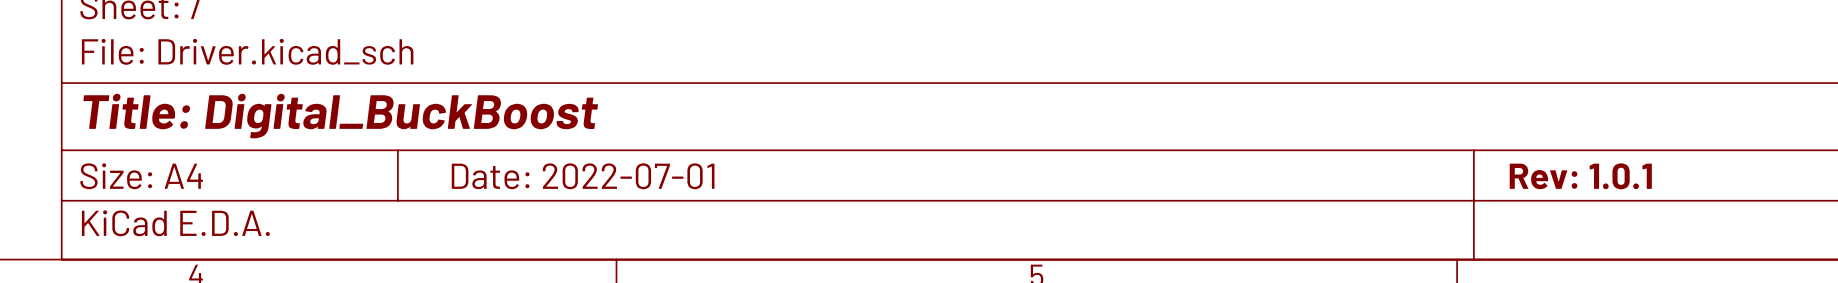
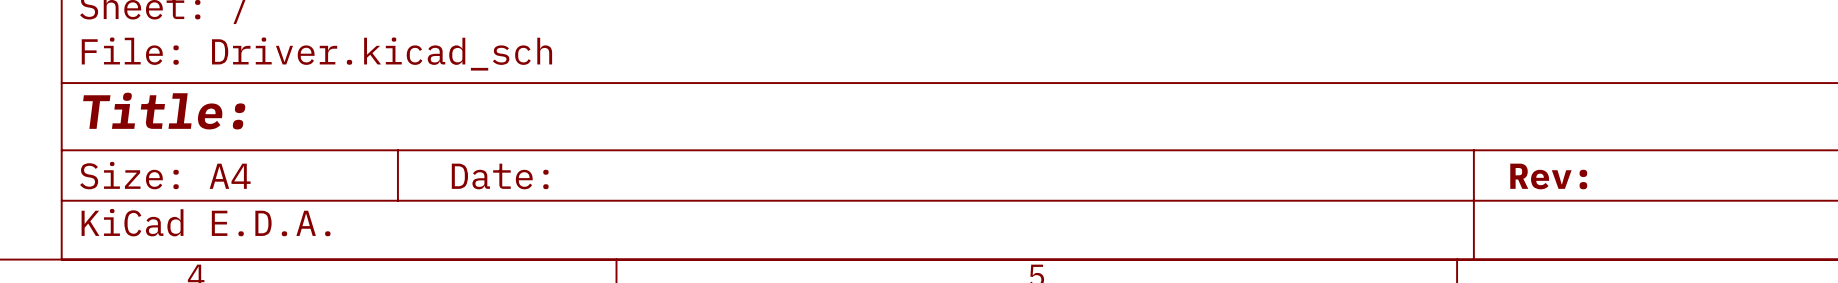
title block: Title: Digital_BuckBoost (340, 116) -> Title: (164, 111)
title block: Date: 2022-07-01 (583, 176) -> Date: (500, 176)
title block: Rev: 1.0.1 (1580, 176) -> Rev: (1548, 176)

